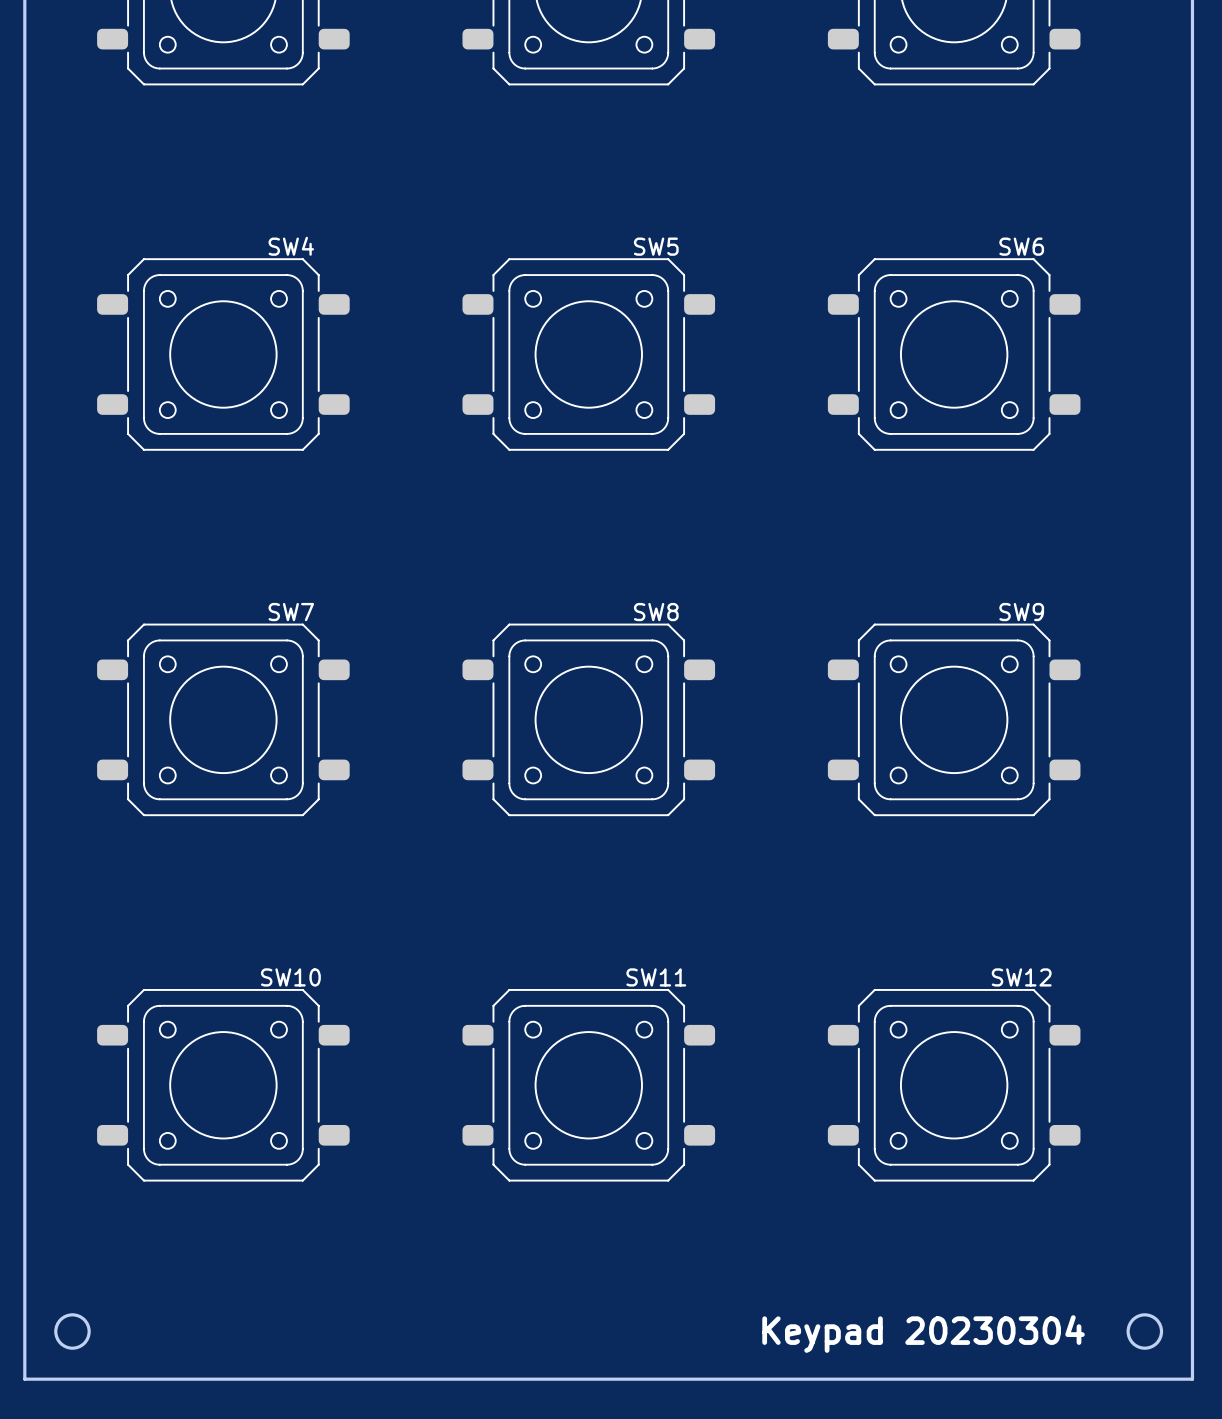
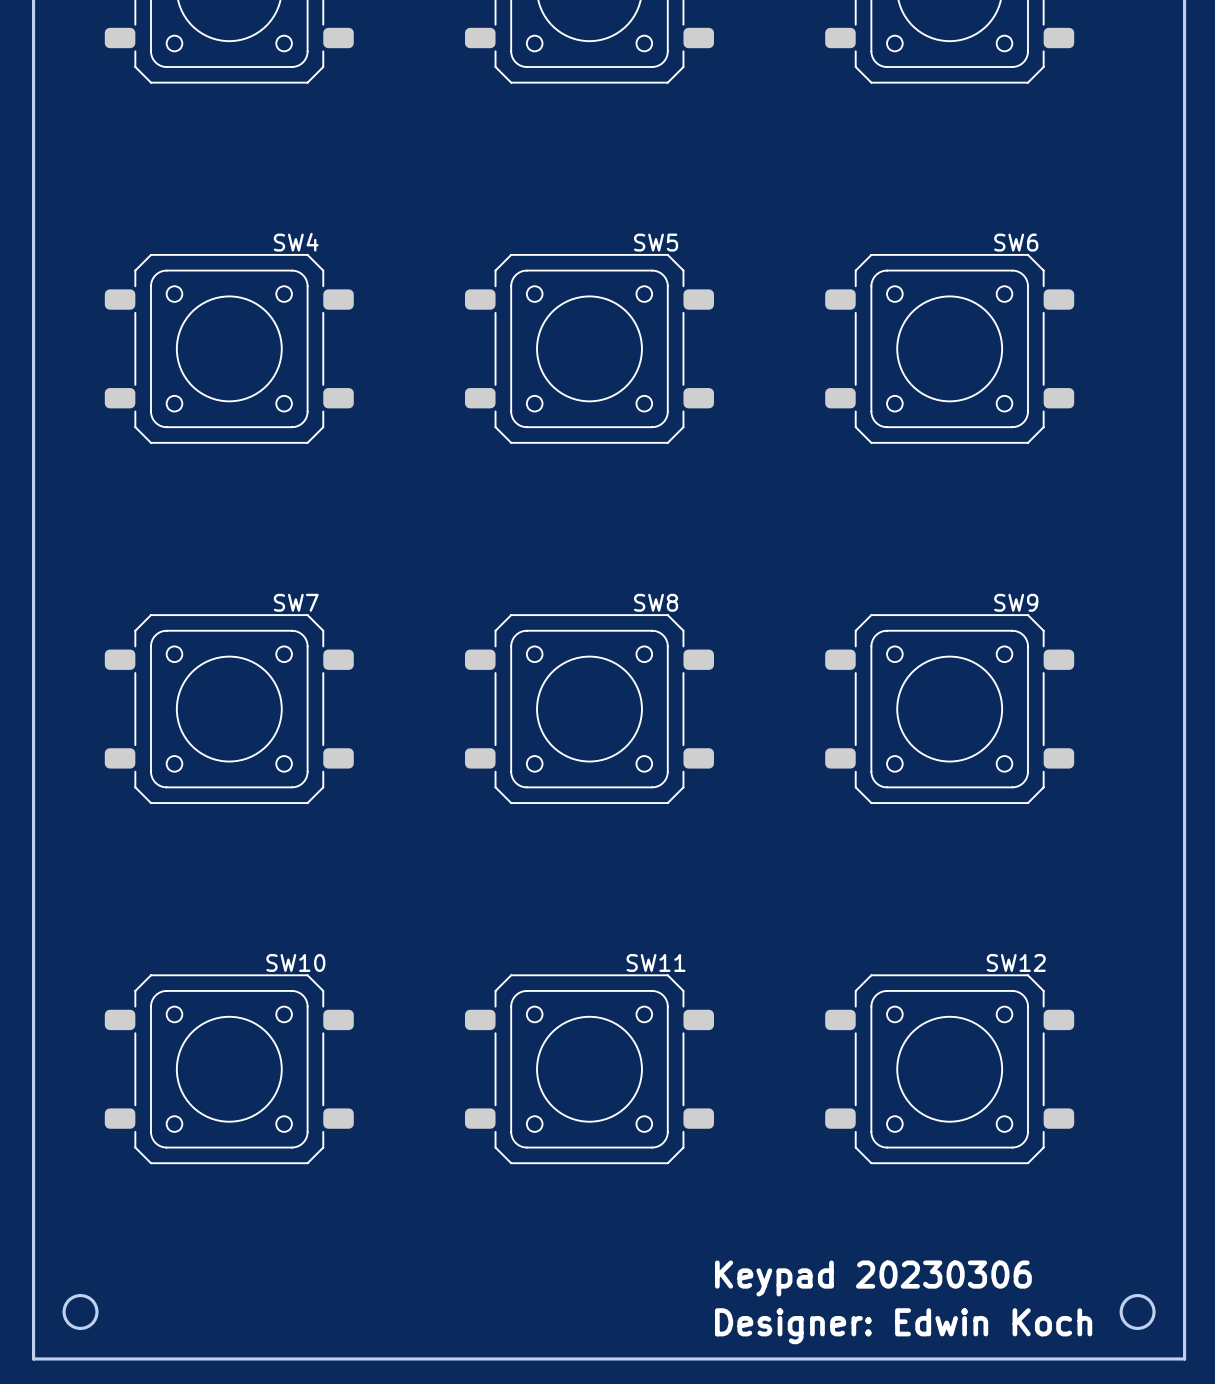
text: Keypad 20230304 (923, 1334) -> Keypad 20230306 (873, 1278)
text: none -> Designer: Edwin Koch (903, 1326)

